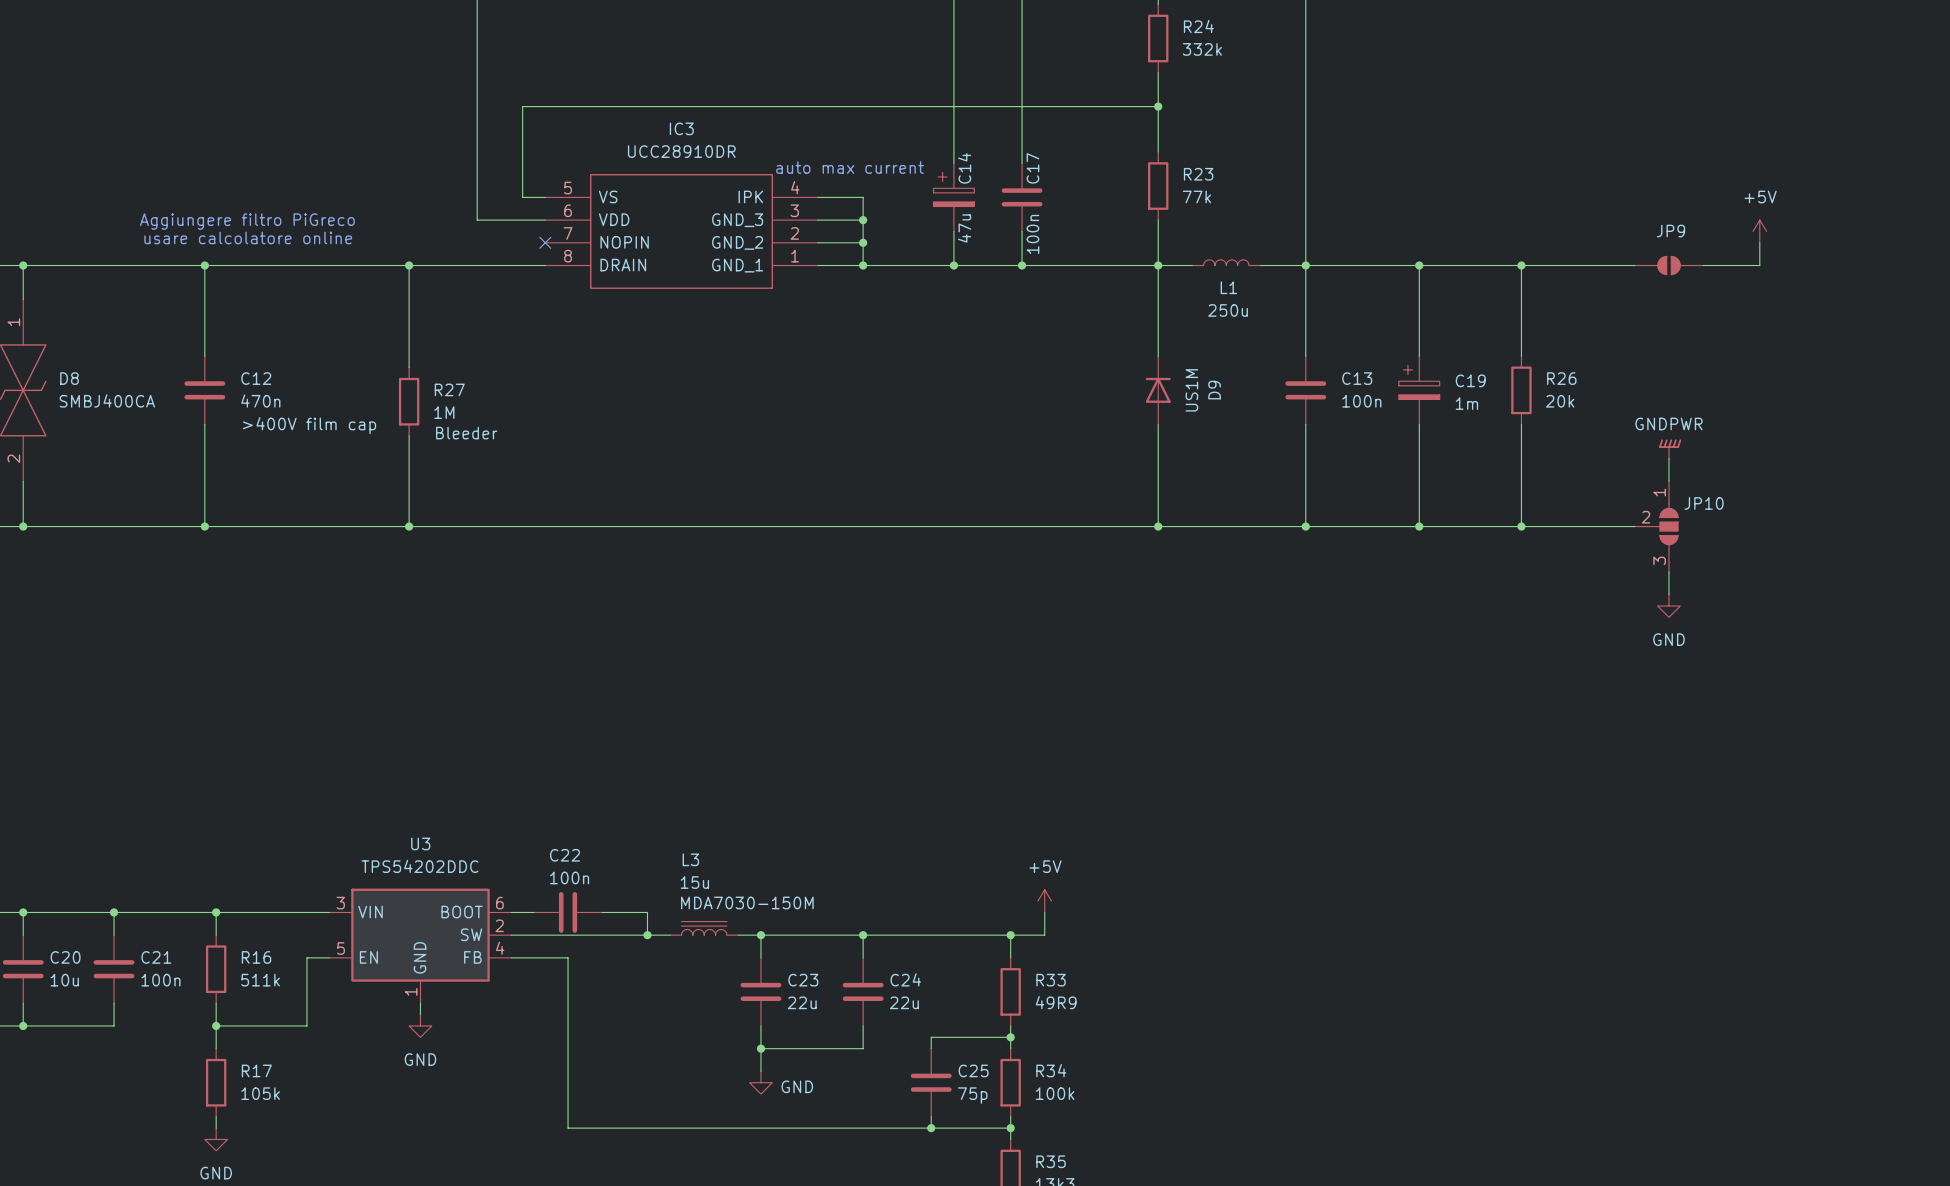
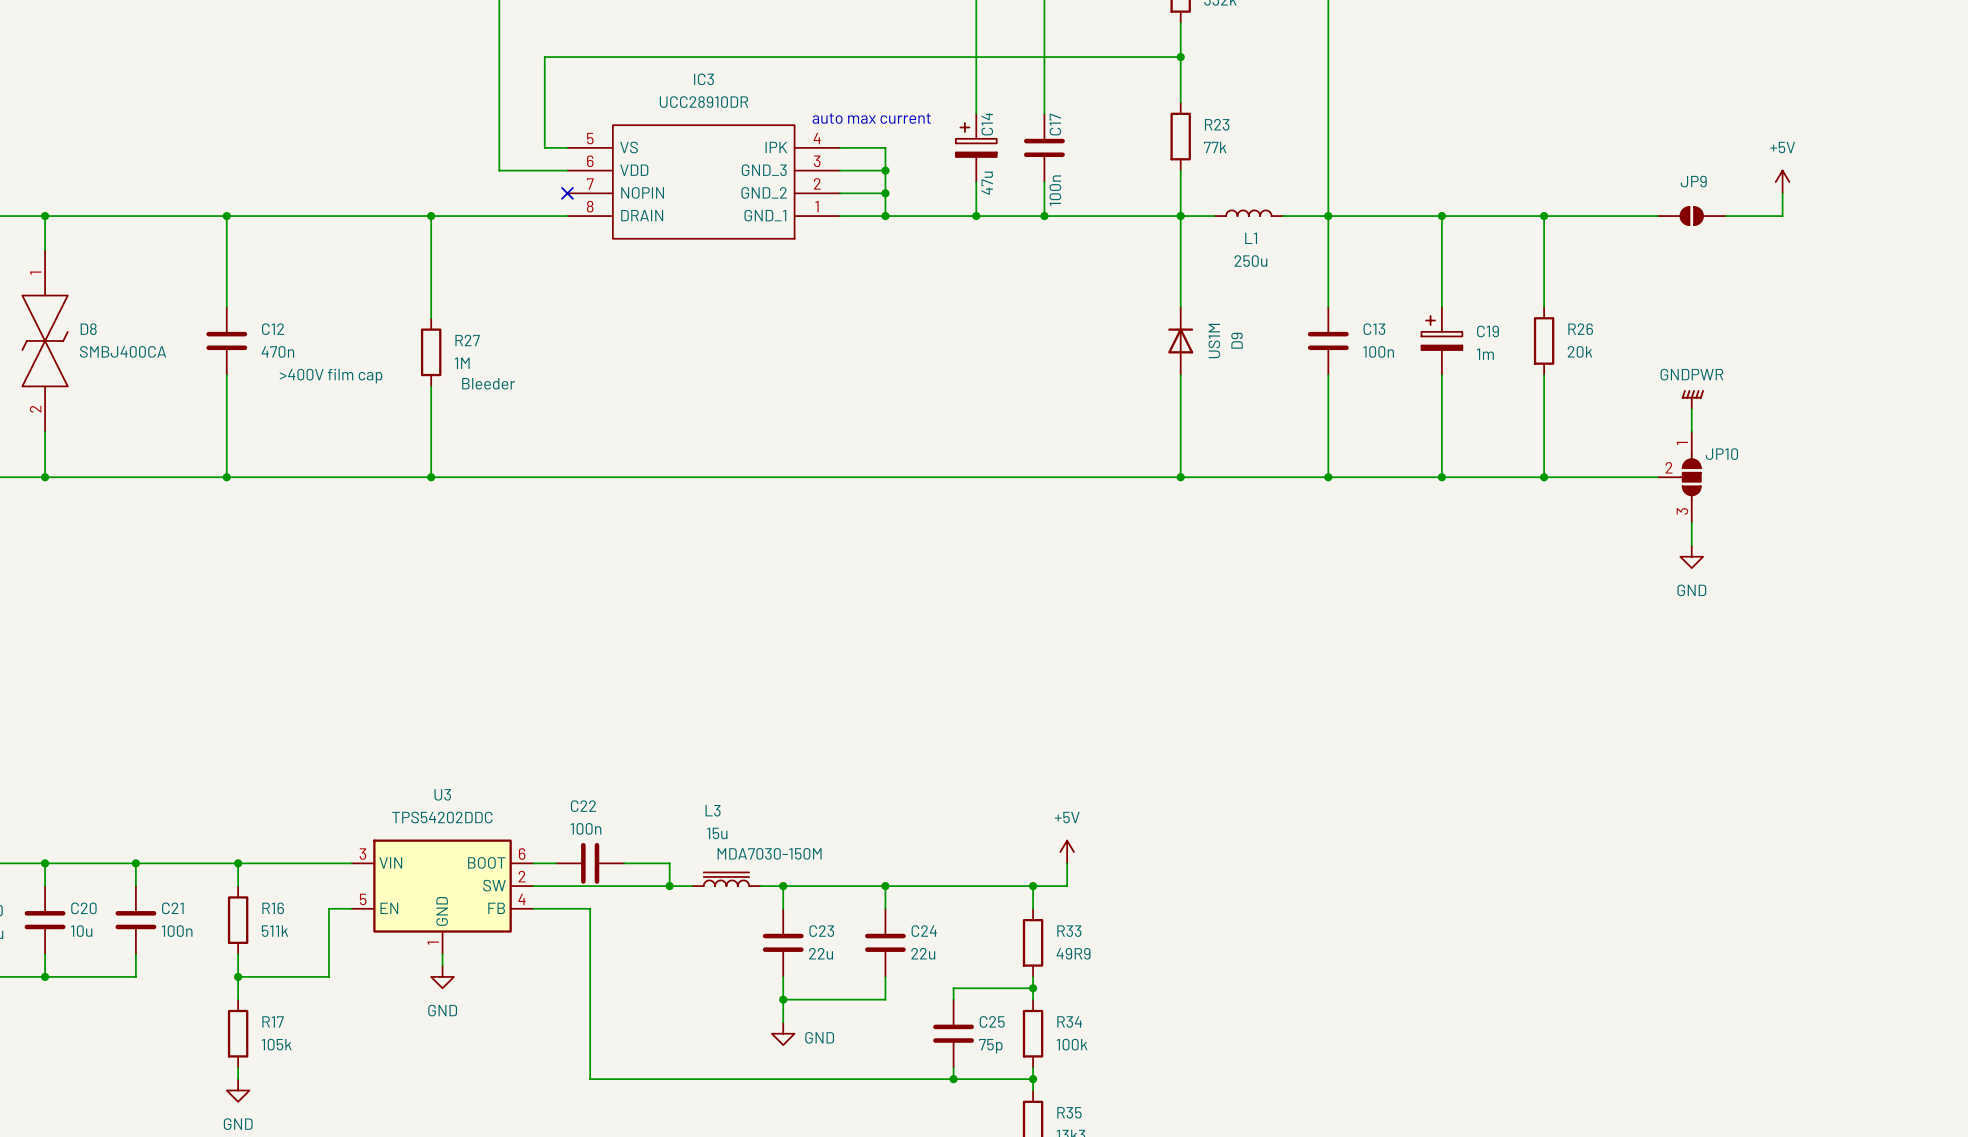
text: Aggiungere filtro PiGreco (247, 221) -> none
text: usare calcolatore online (248, 237) -> none

